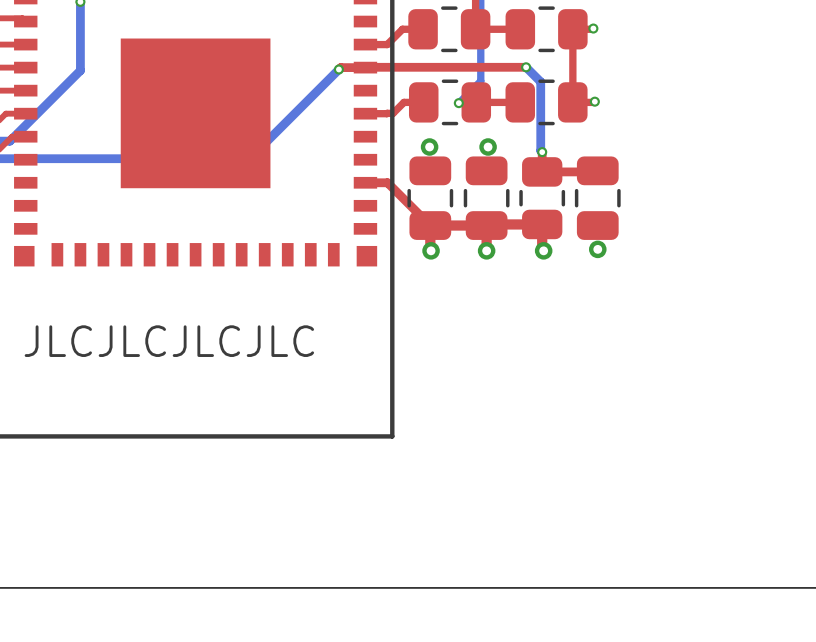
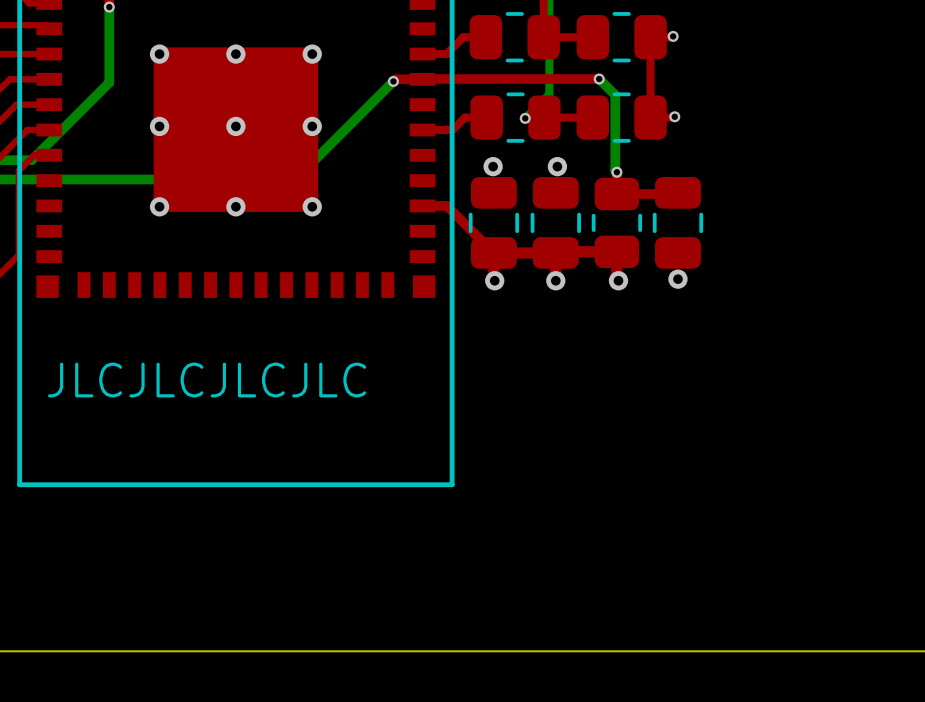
via: none -> (159, 54)
via: none -> (235, 54)
via: none -> (312, 54)
via: none -> (159, 126)
via: none -> (235, 126)
via: none -> (312, 126)
via: none -> (159, 206)
via: none -> (235, 206)
via: none -> (312, 206)

